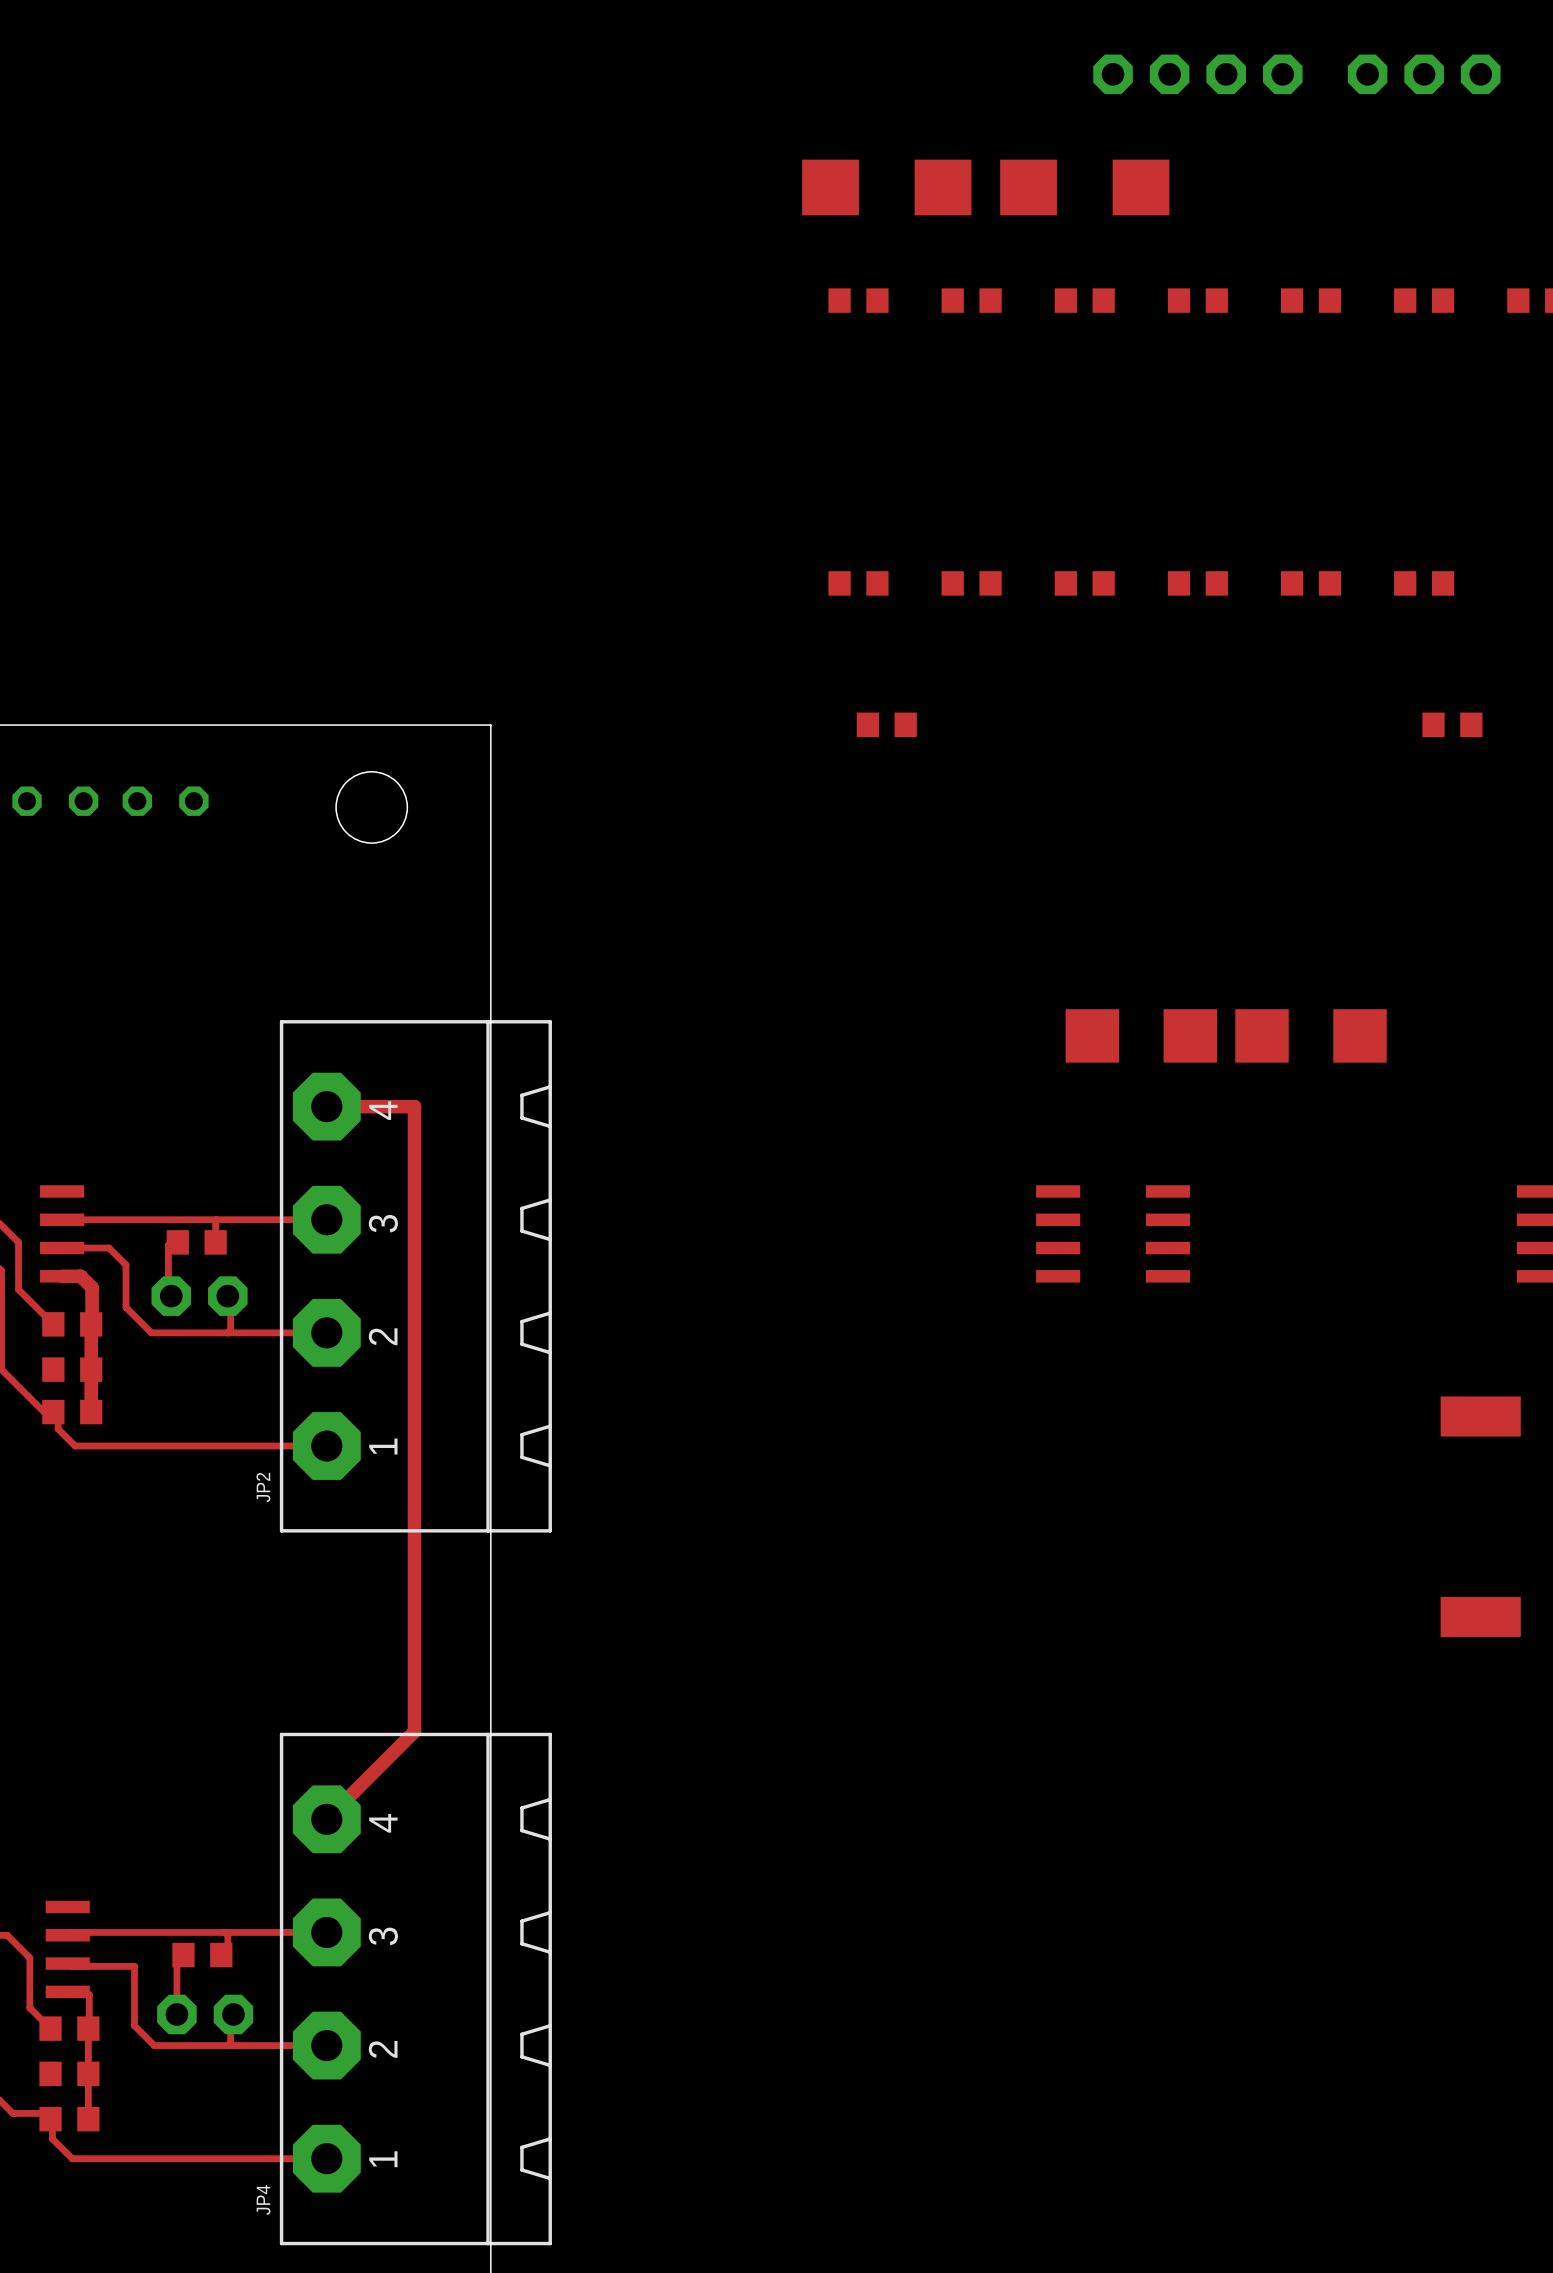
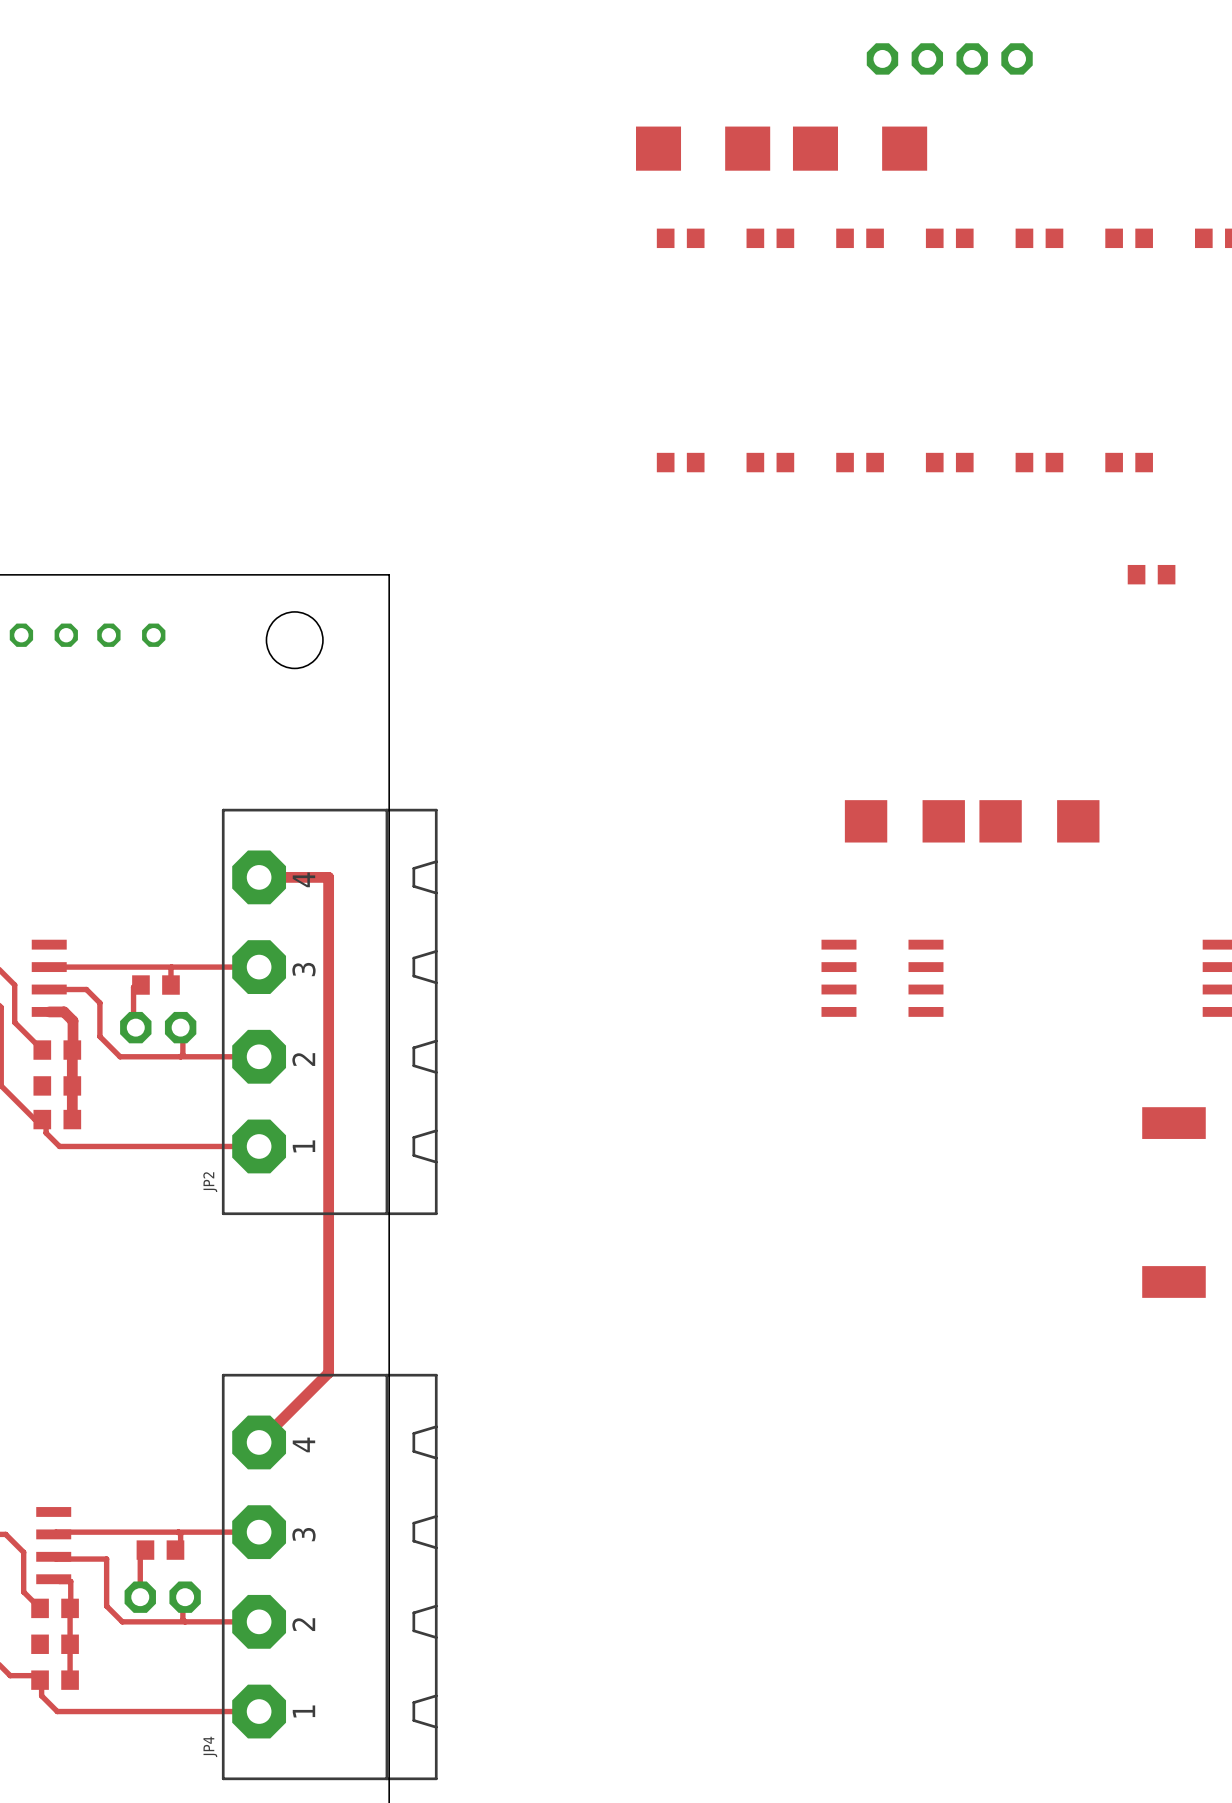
part: (1424, 74) -> none
part: (886, 724) -> none

